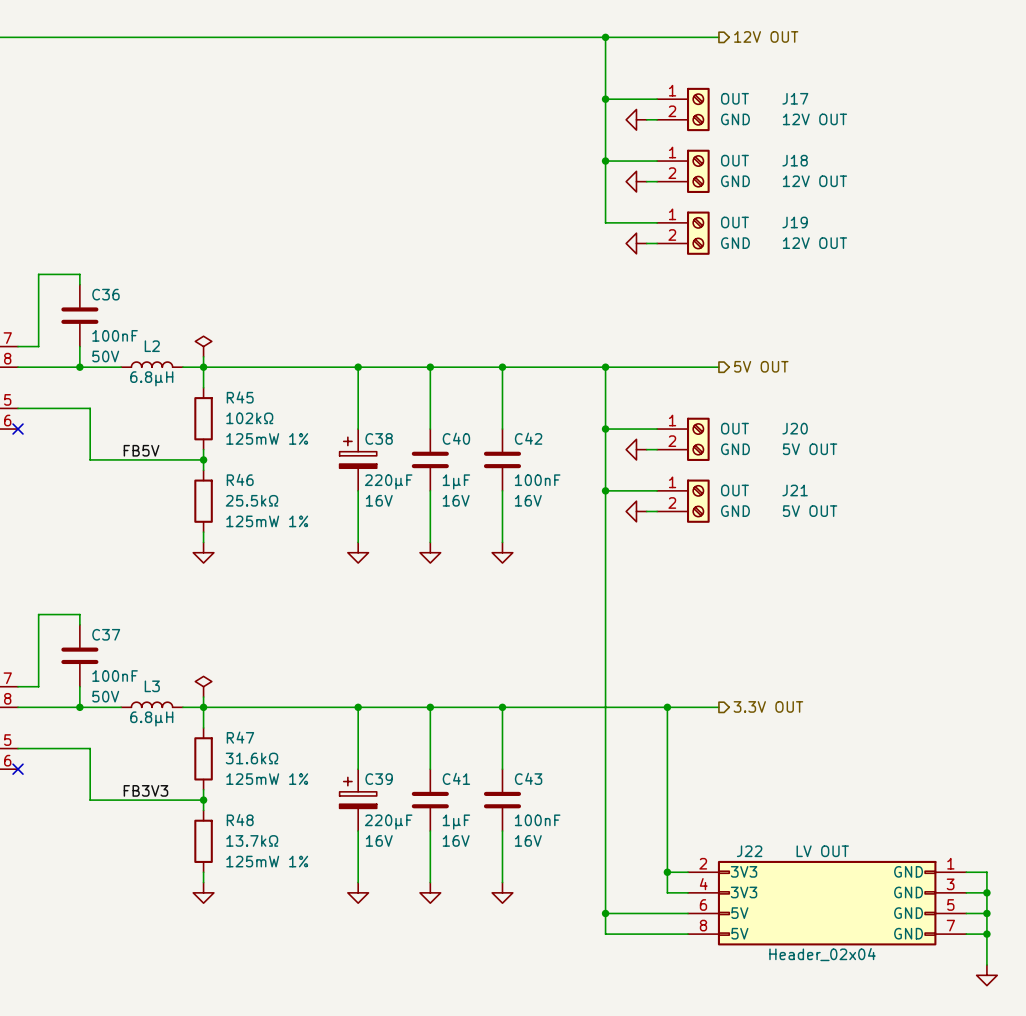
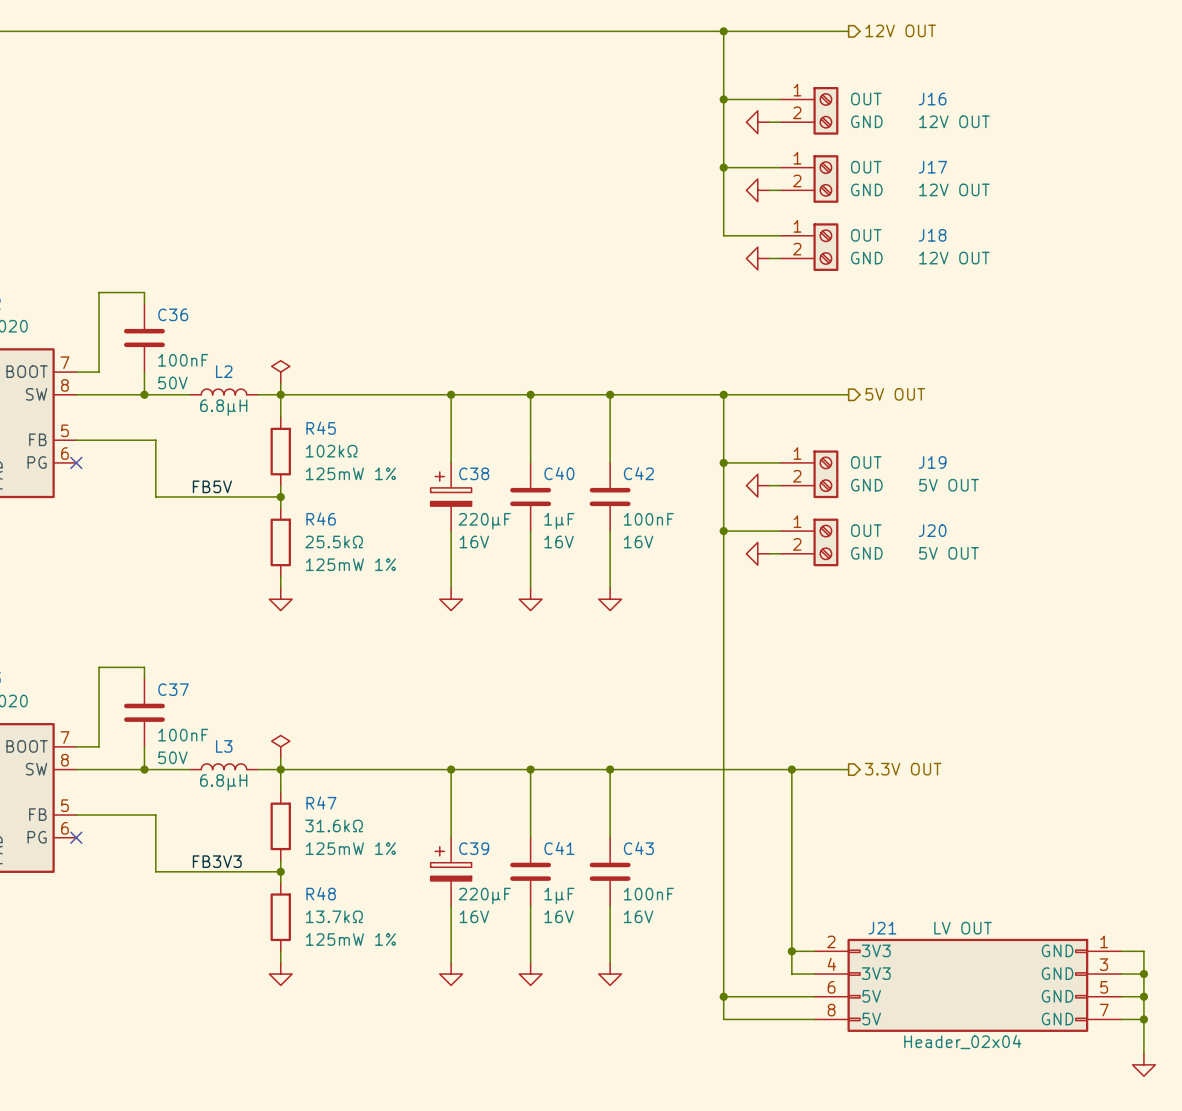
J17 name: J17 (795, 98) -> J16 (932, 99)
J18 name: J18 (795, 160) -> J17 (932, 167)
J19 name: J19 (795, 222) -> J18 (932, 235)
J20 name: J20 (795, 428) -> J19 (932, 462)
J21 name: J21 (795, 490) -> J20 (932, 530)
J22 name: J22 (749, 851) -> J21 (882, 928)

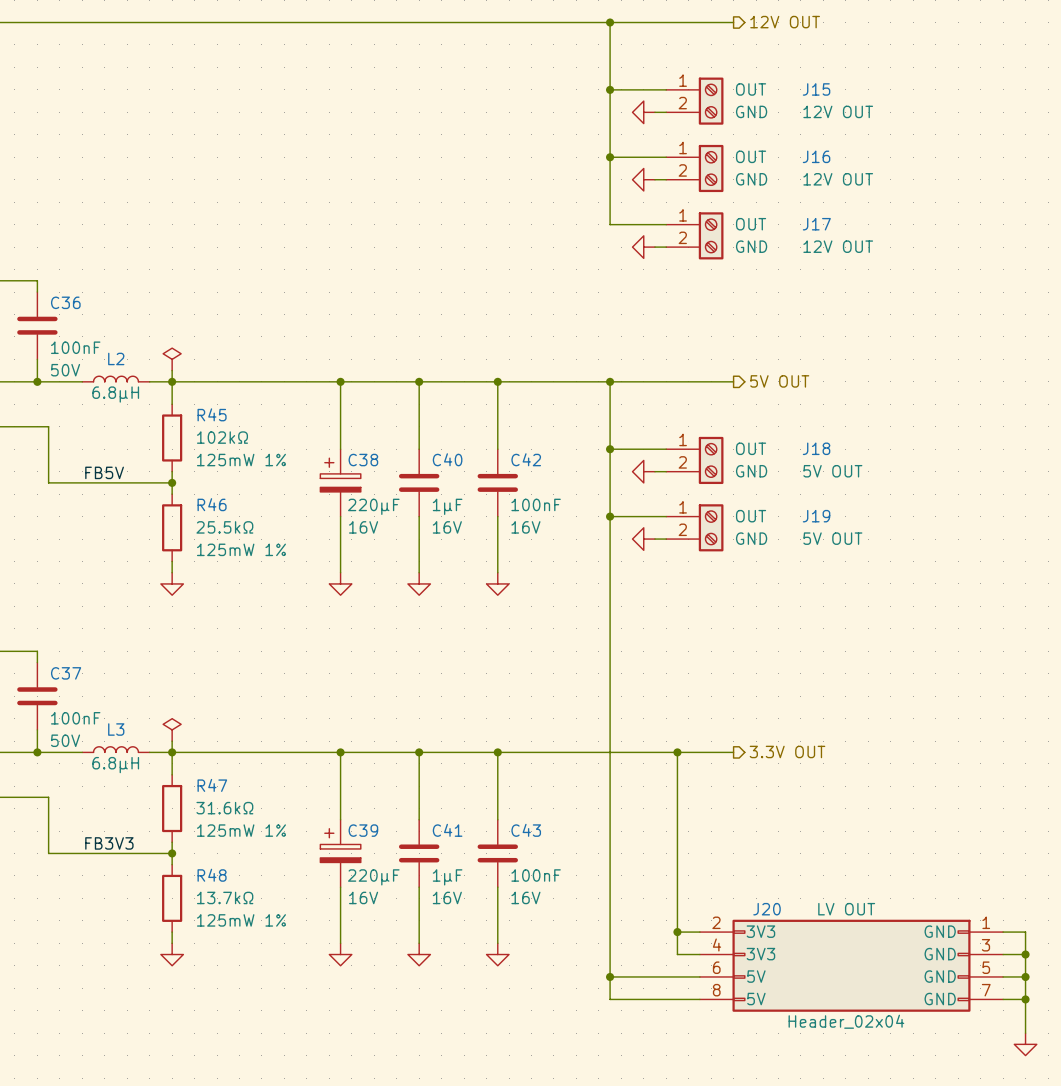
J16 name: J16 (932, 99) -> J15 (816, 89)
J17 name: J17 (932, 167) -> J16 (816, 156)
J18 name: J18 (932, 235) -> J17 (816, 224)
J19 name: J19 (932, 462) -> J18 (816, 448)
J20 name: J20 (932, 530) -> J19 (816, 516)
J21 name: J21 (882, 928) -> J20 (767, 909)

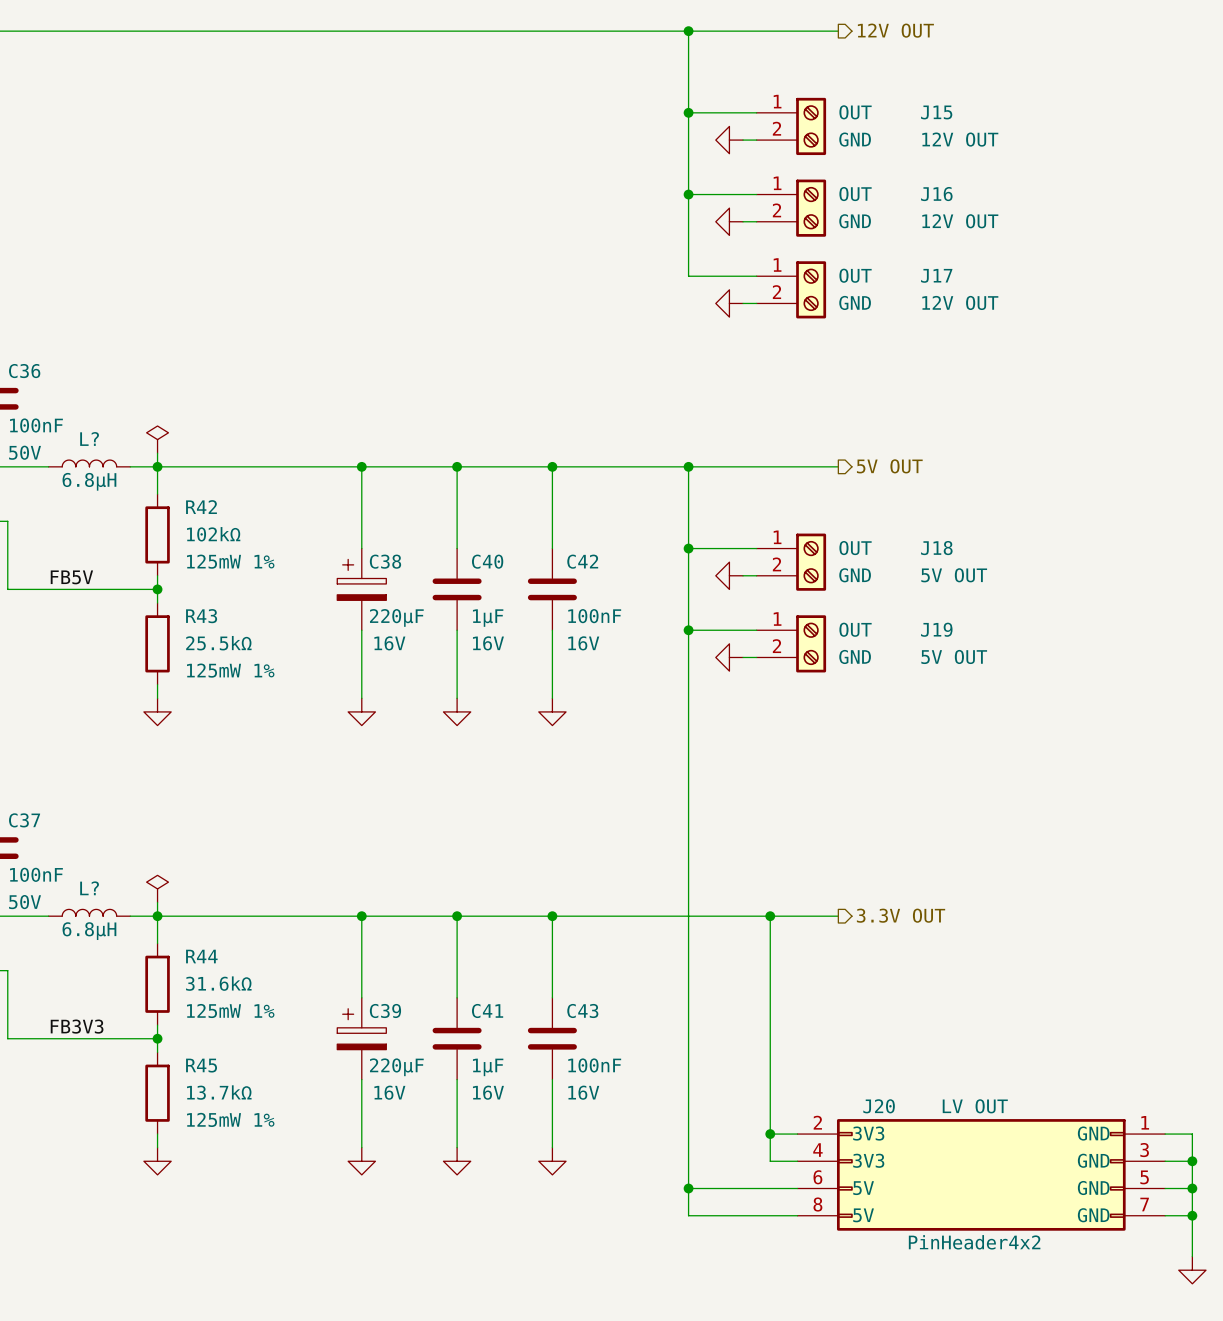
L2 name: L2 (116, 358) -> L? (89, 438)
R45 name: R45 (212, 414) -> R42 (201, 507)
R46 name: R46 (212, 504) -> R43 (201, 616)
L3 name: L3 (116, 729) -> L? (89, 888)
R47 name: R47 (212, 785) -> R44 (201, 956)
R48 name: R48 (212, 875) -> R45 (201, 1065)
J20 value: Header_02x04 (846, 1021) -> PinHeader4x2 (974, 1242)

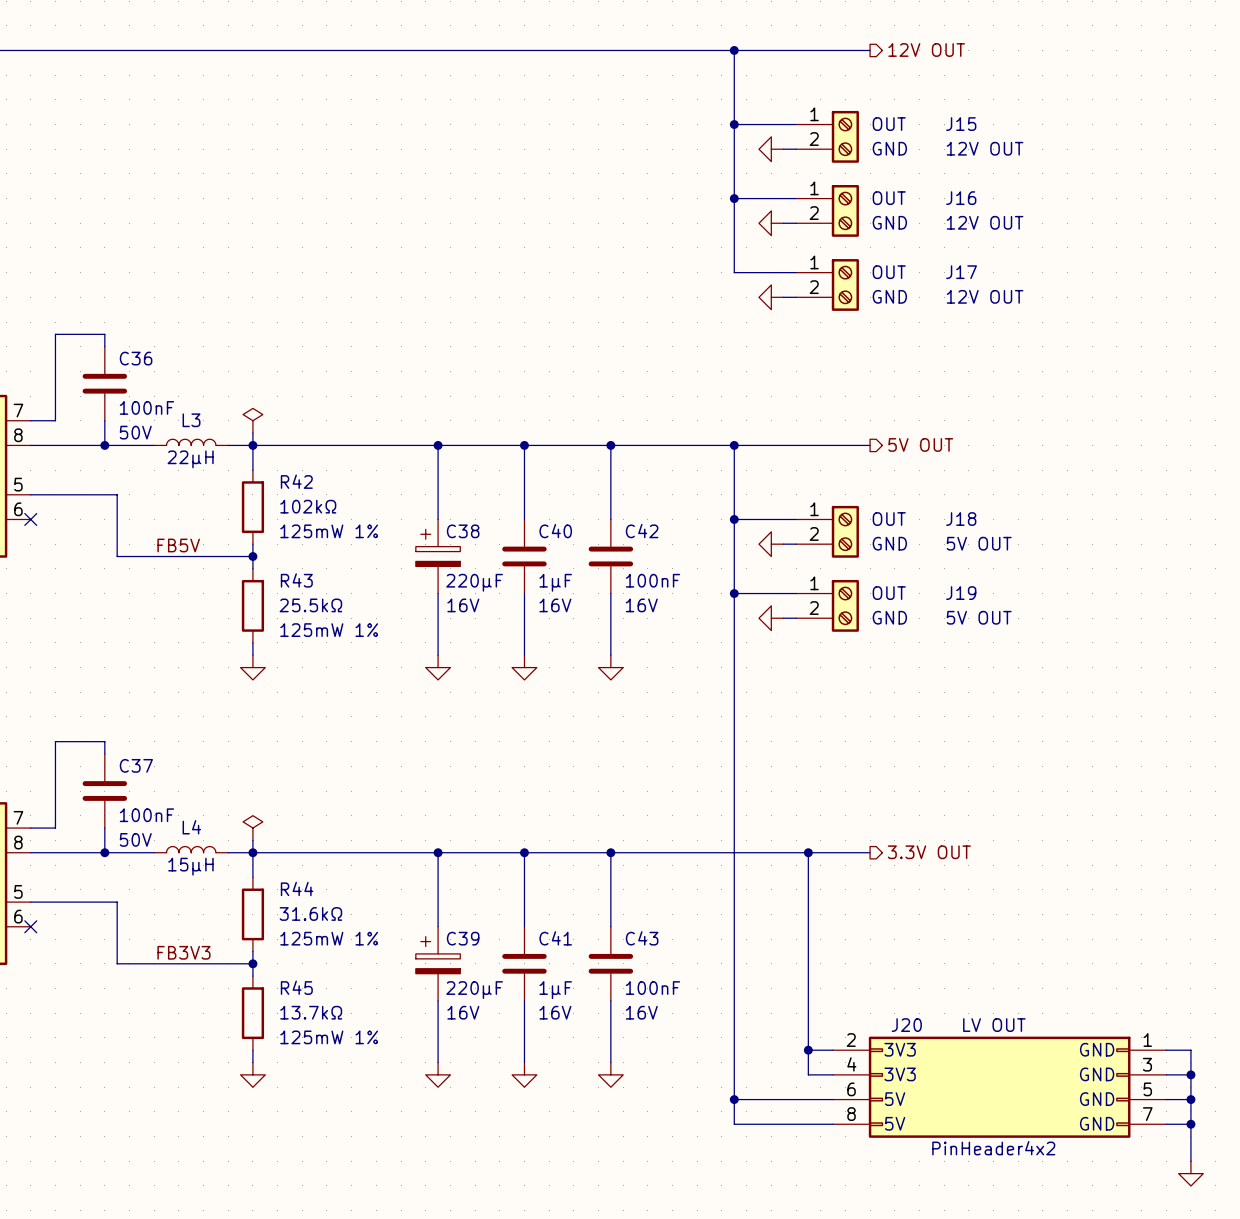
L? name: L? (89, 438) -> L3 (191, 420)
L? value: 6.8μH (89, 481) -> 22μH (190, 459)
L? name: L? (89, 888) -> L4 (191, 827)
L? value: 6.8μH (89, 931) -> 15μH (190, 866)

